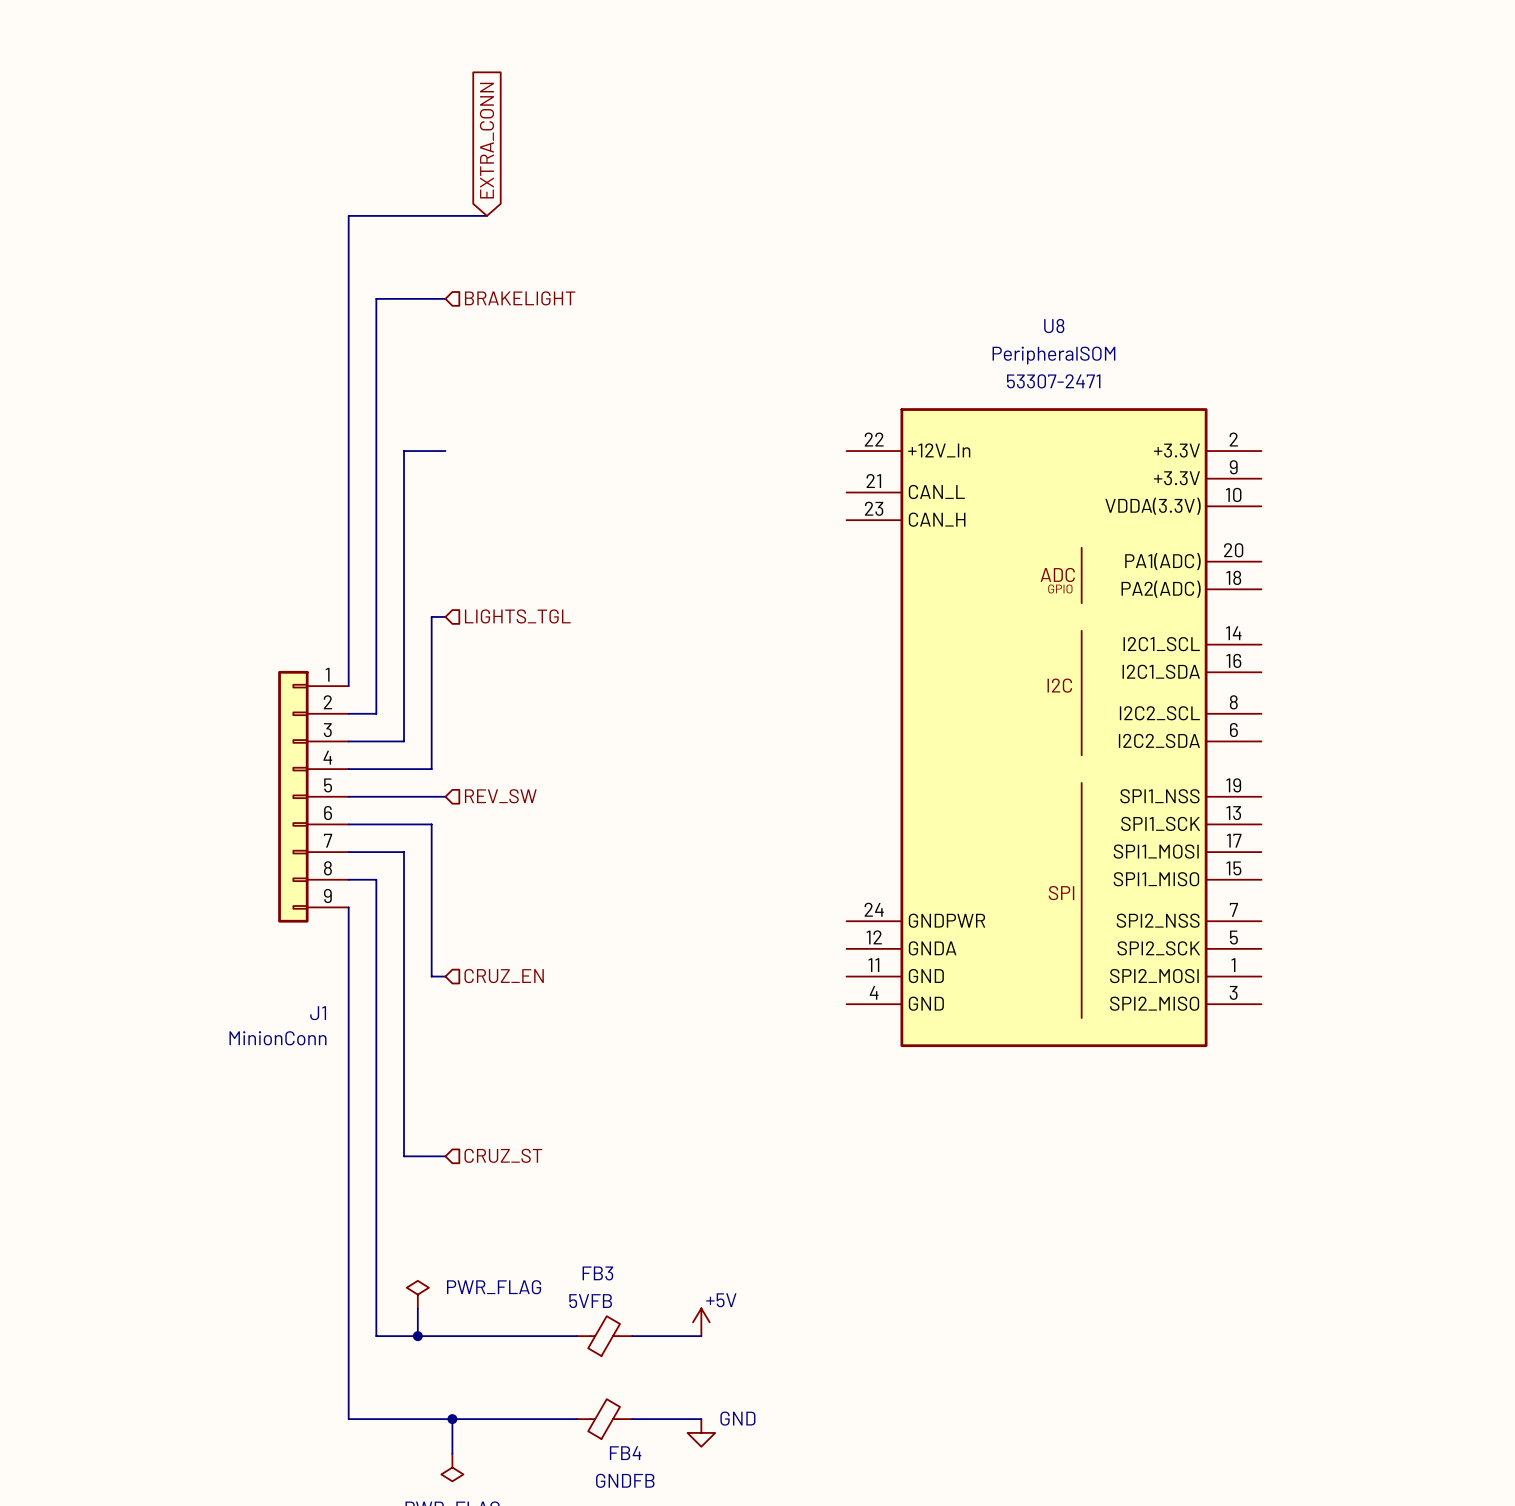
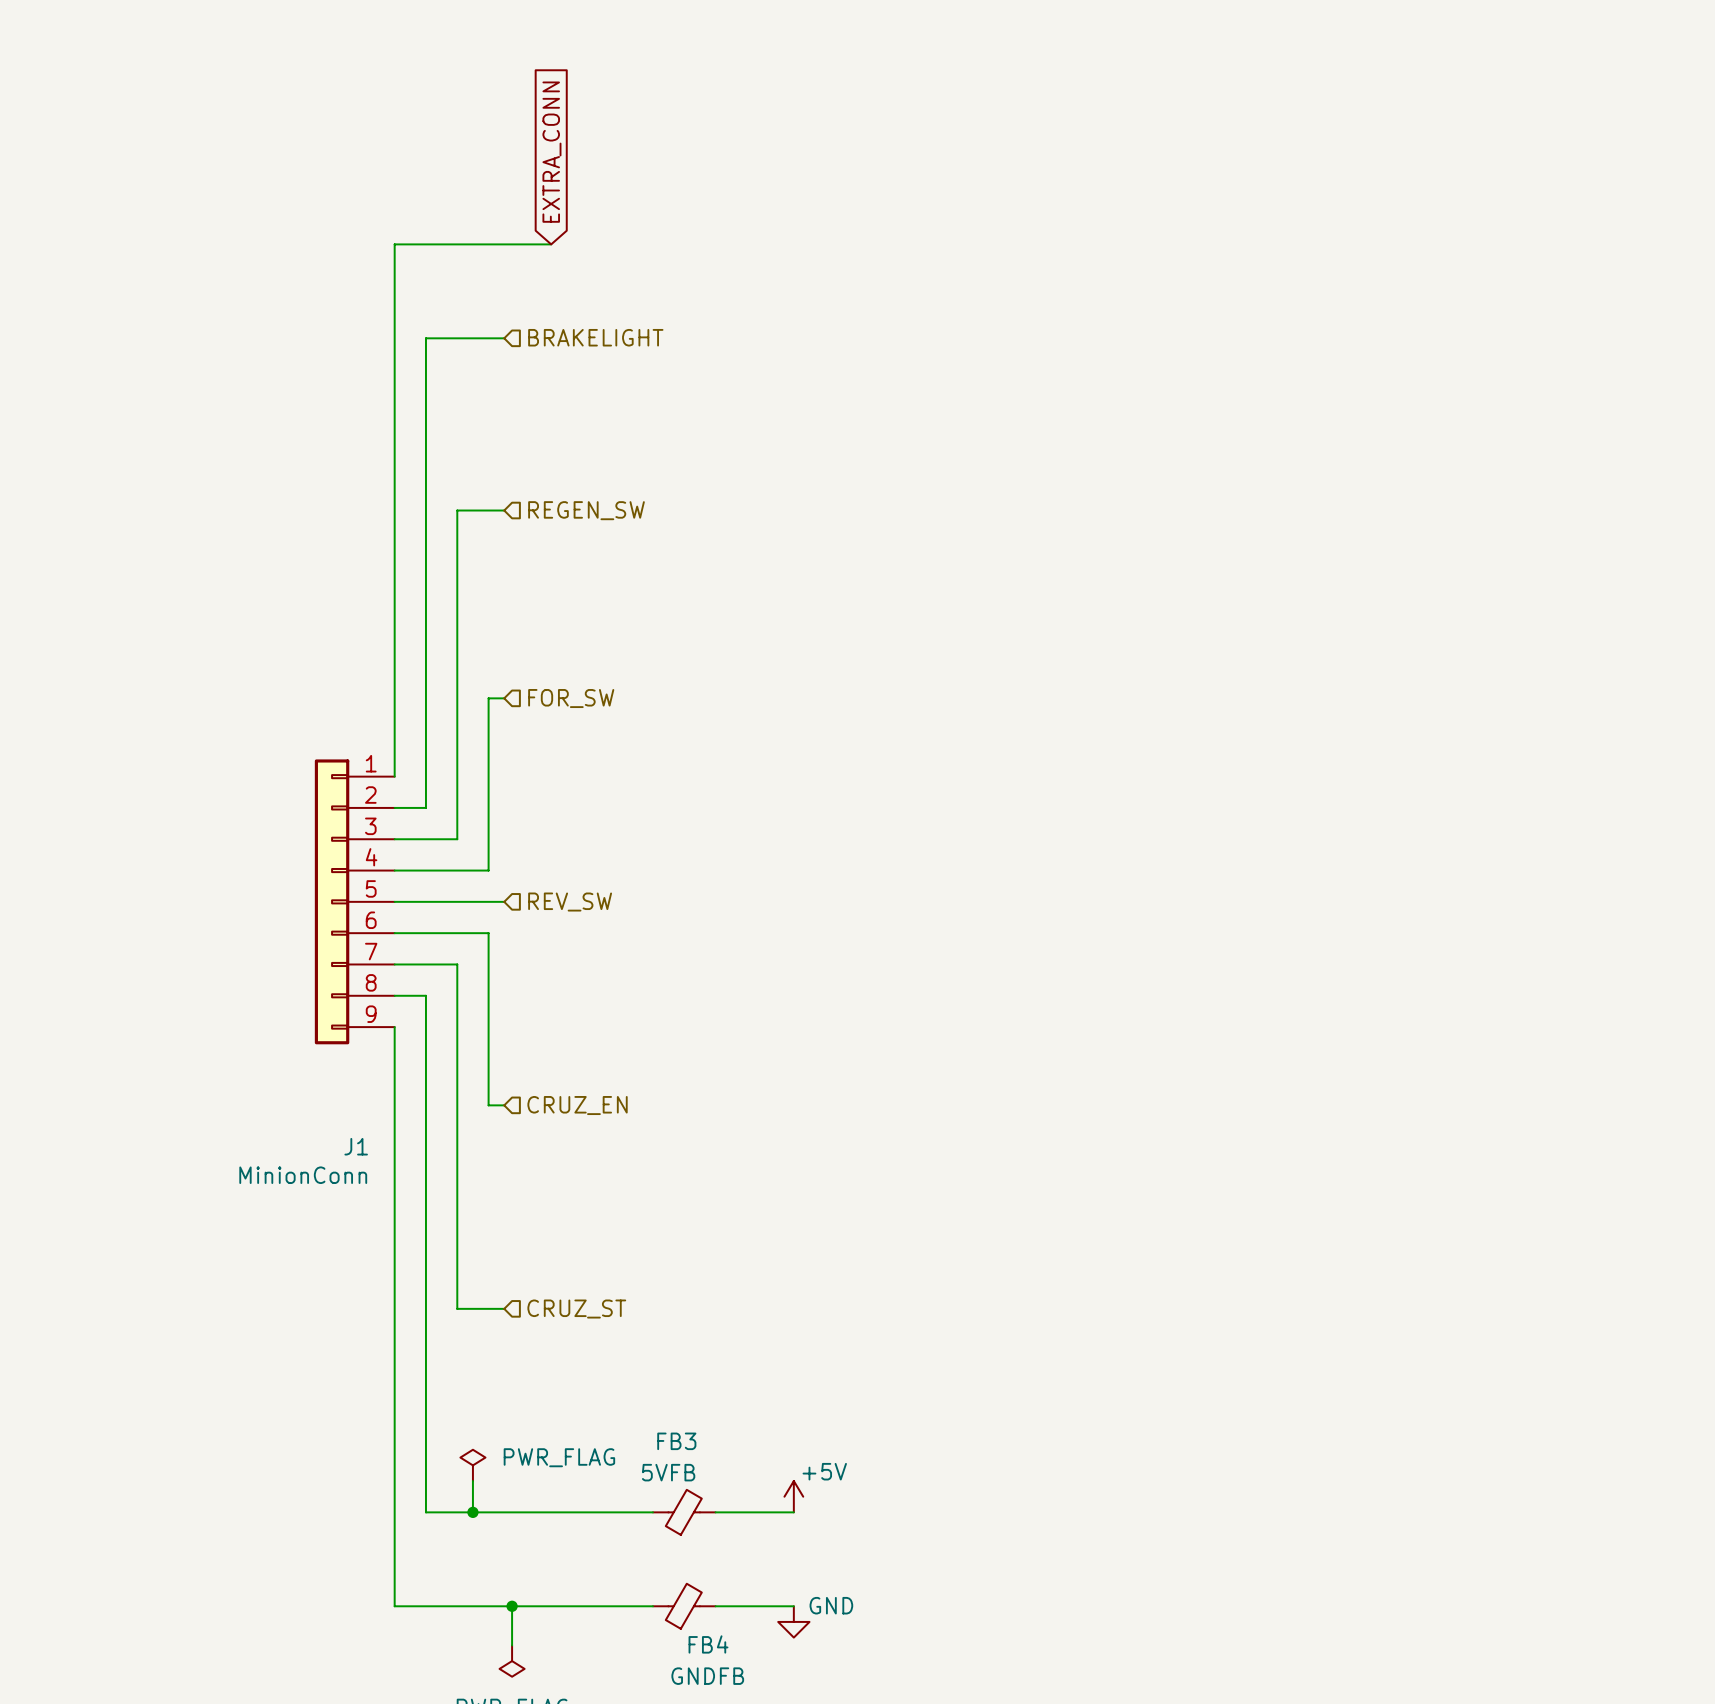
hierarchical label: none -> REGEN_SW (586, 510)
hierarchical label: LIGHTS_TGL (517, 616) -> FOR_SW (571, 698)
U8: PeripheralSOM (1054, 727) -> none

